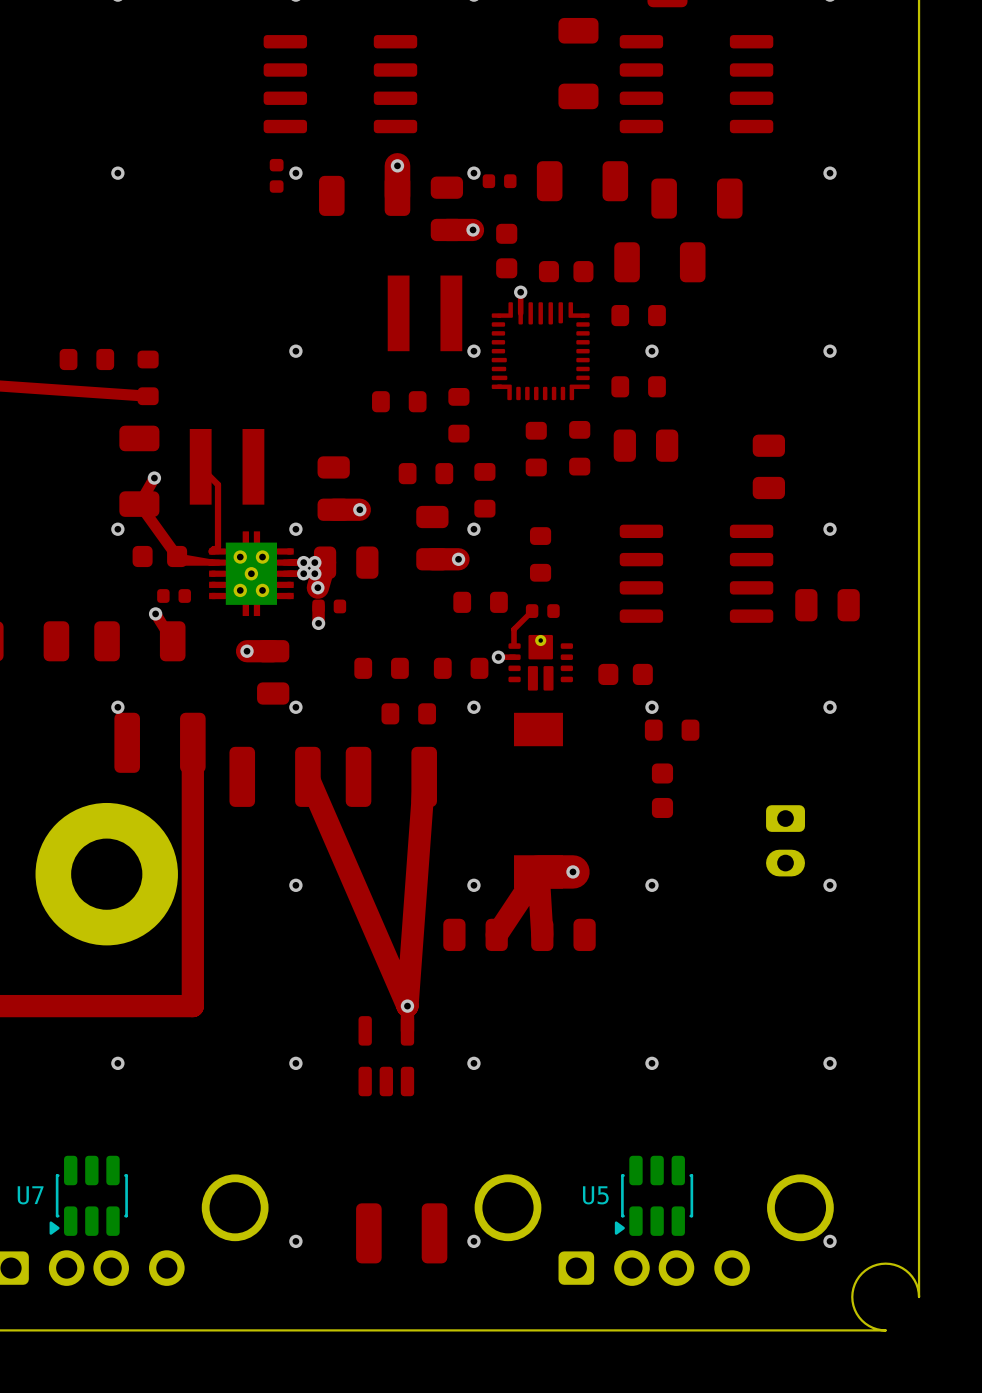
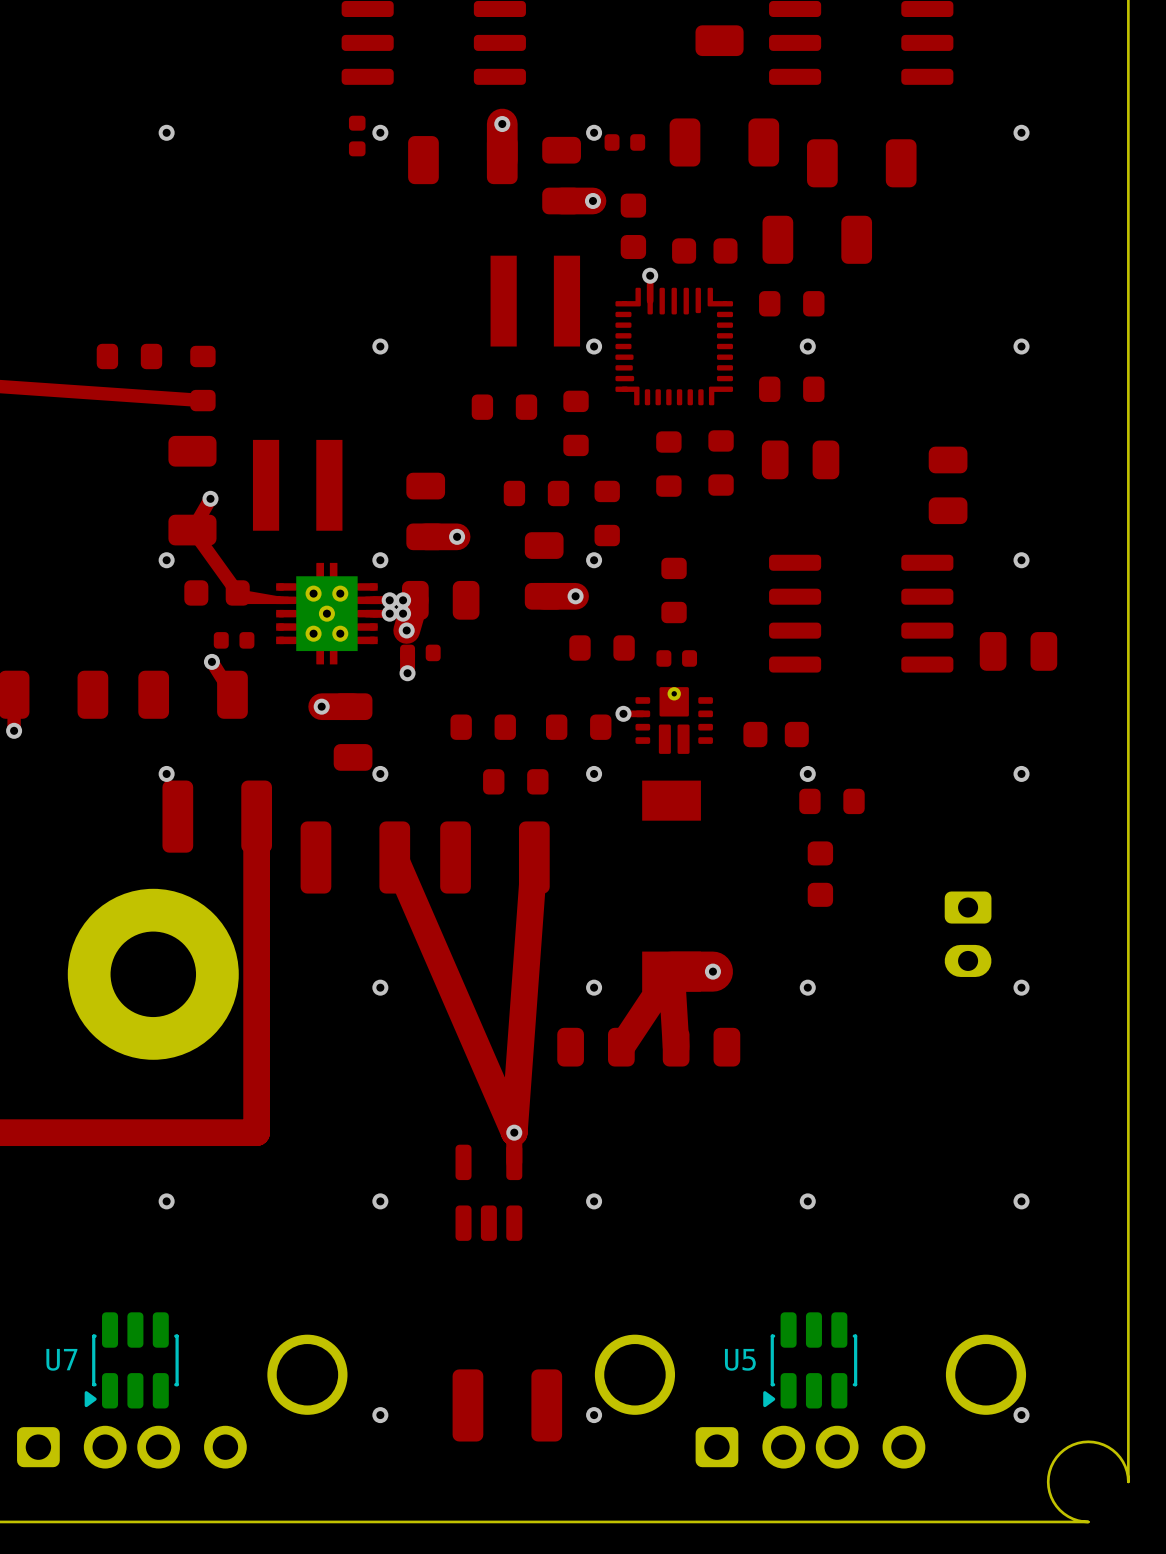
top track: (200, 466) (218, 484) (218, 547) (211, 551) -> none
top track: (531, 611) (514, 629) (514, 644) -> none

